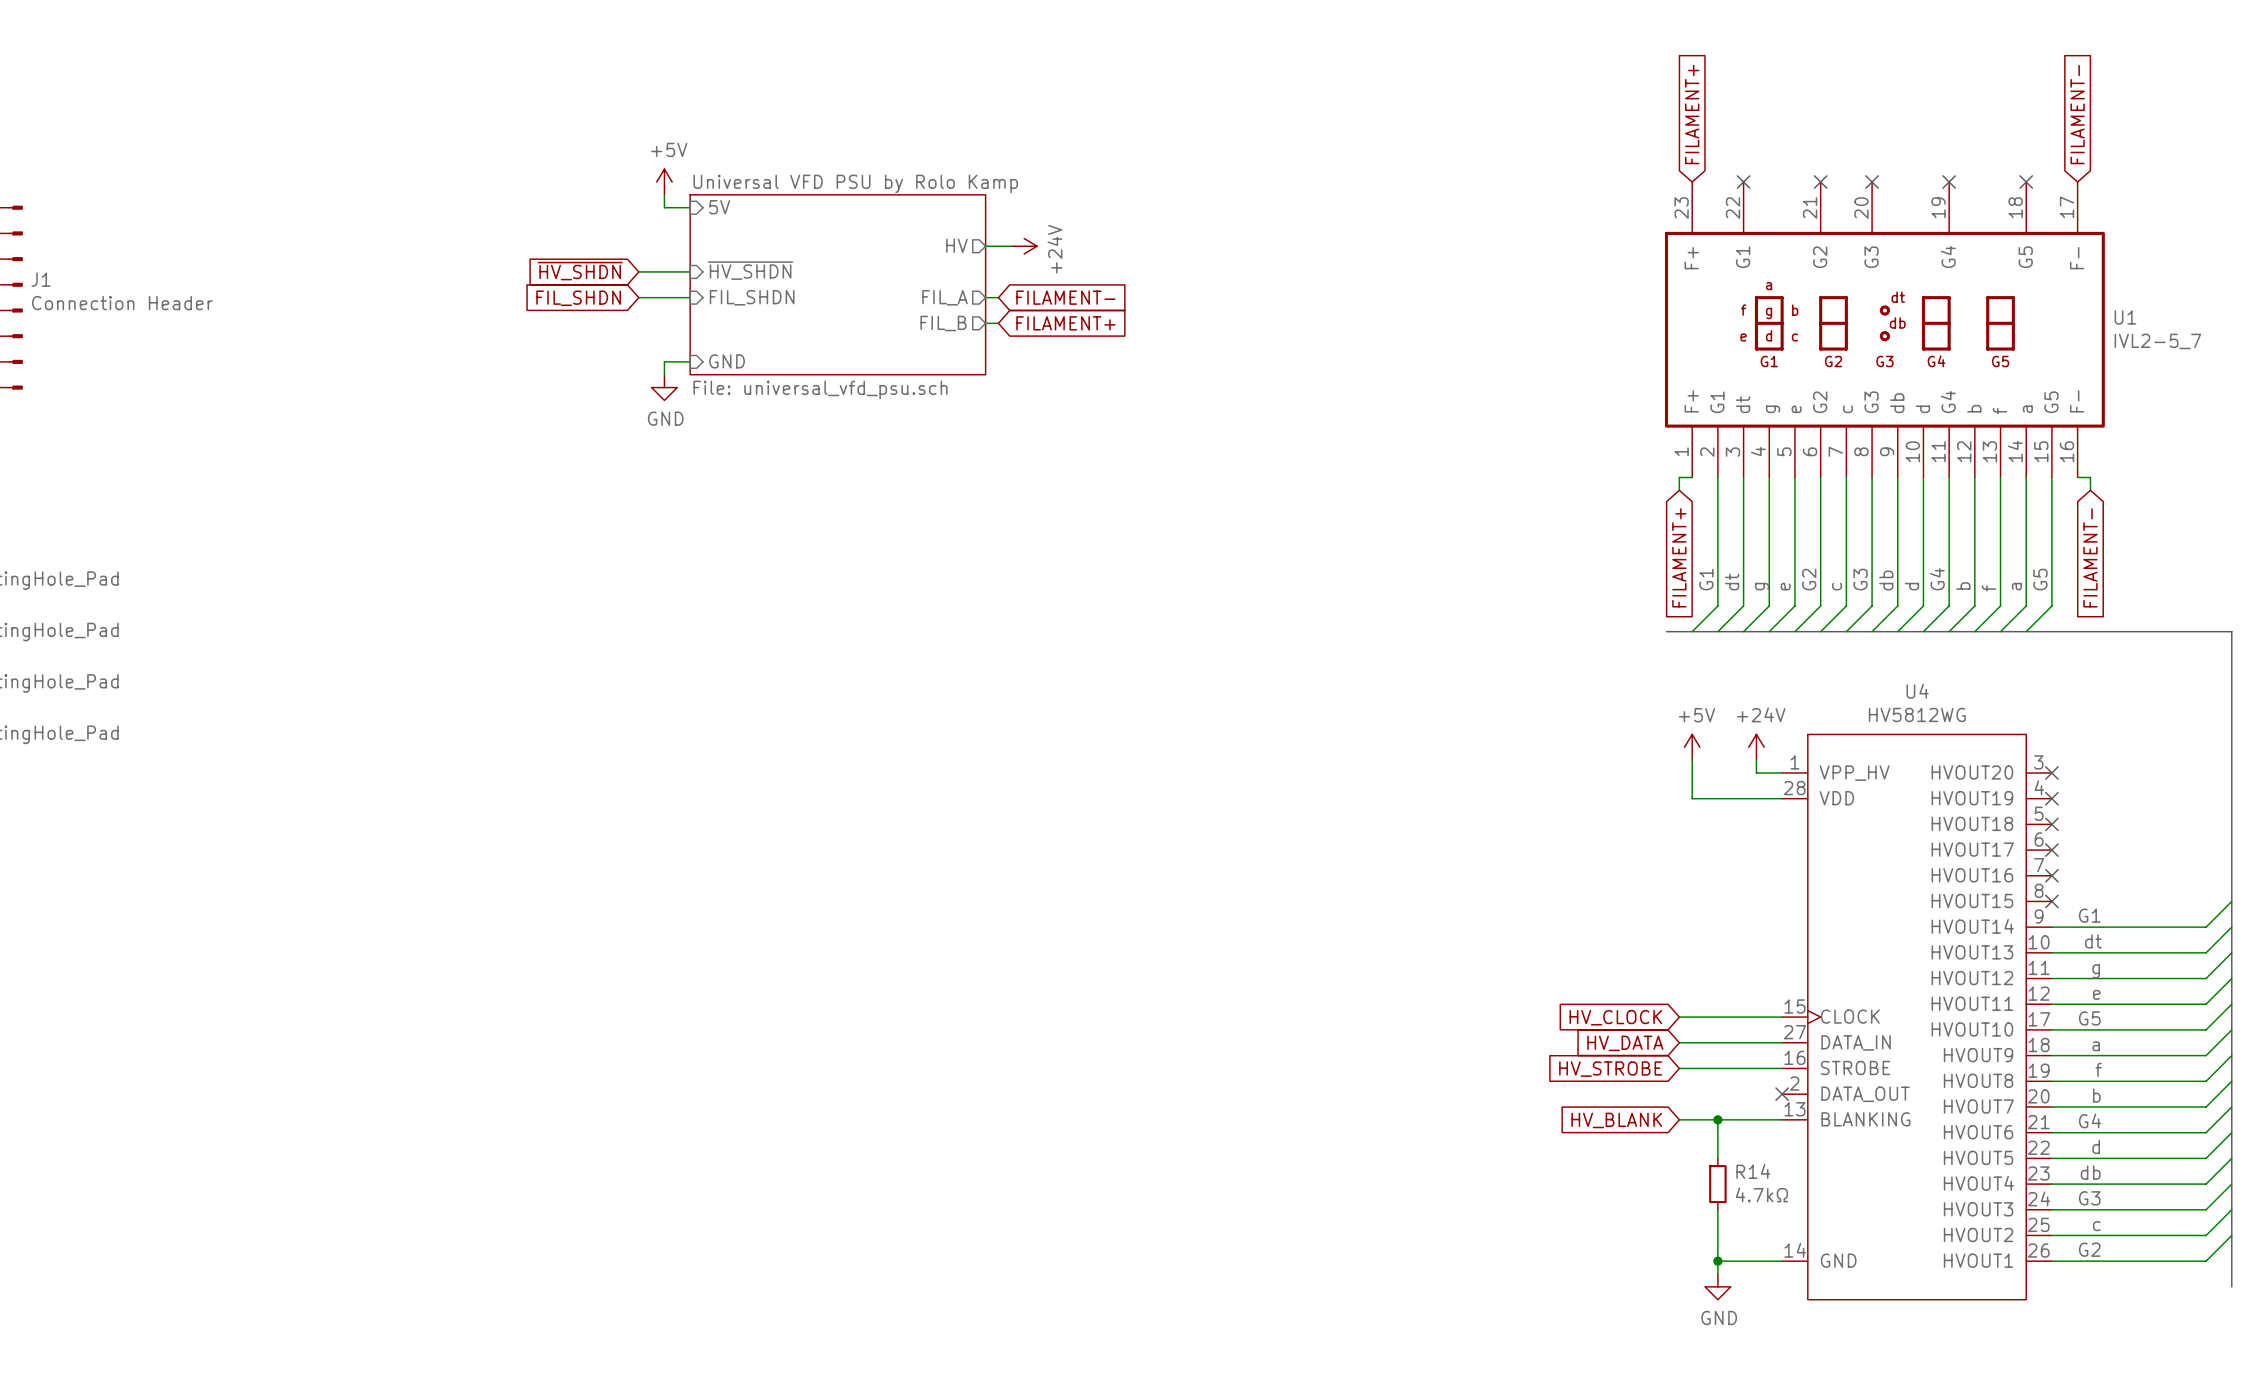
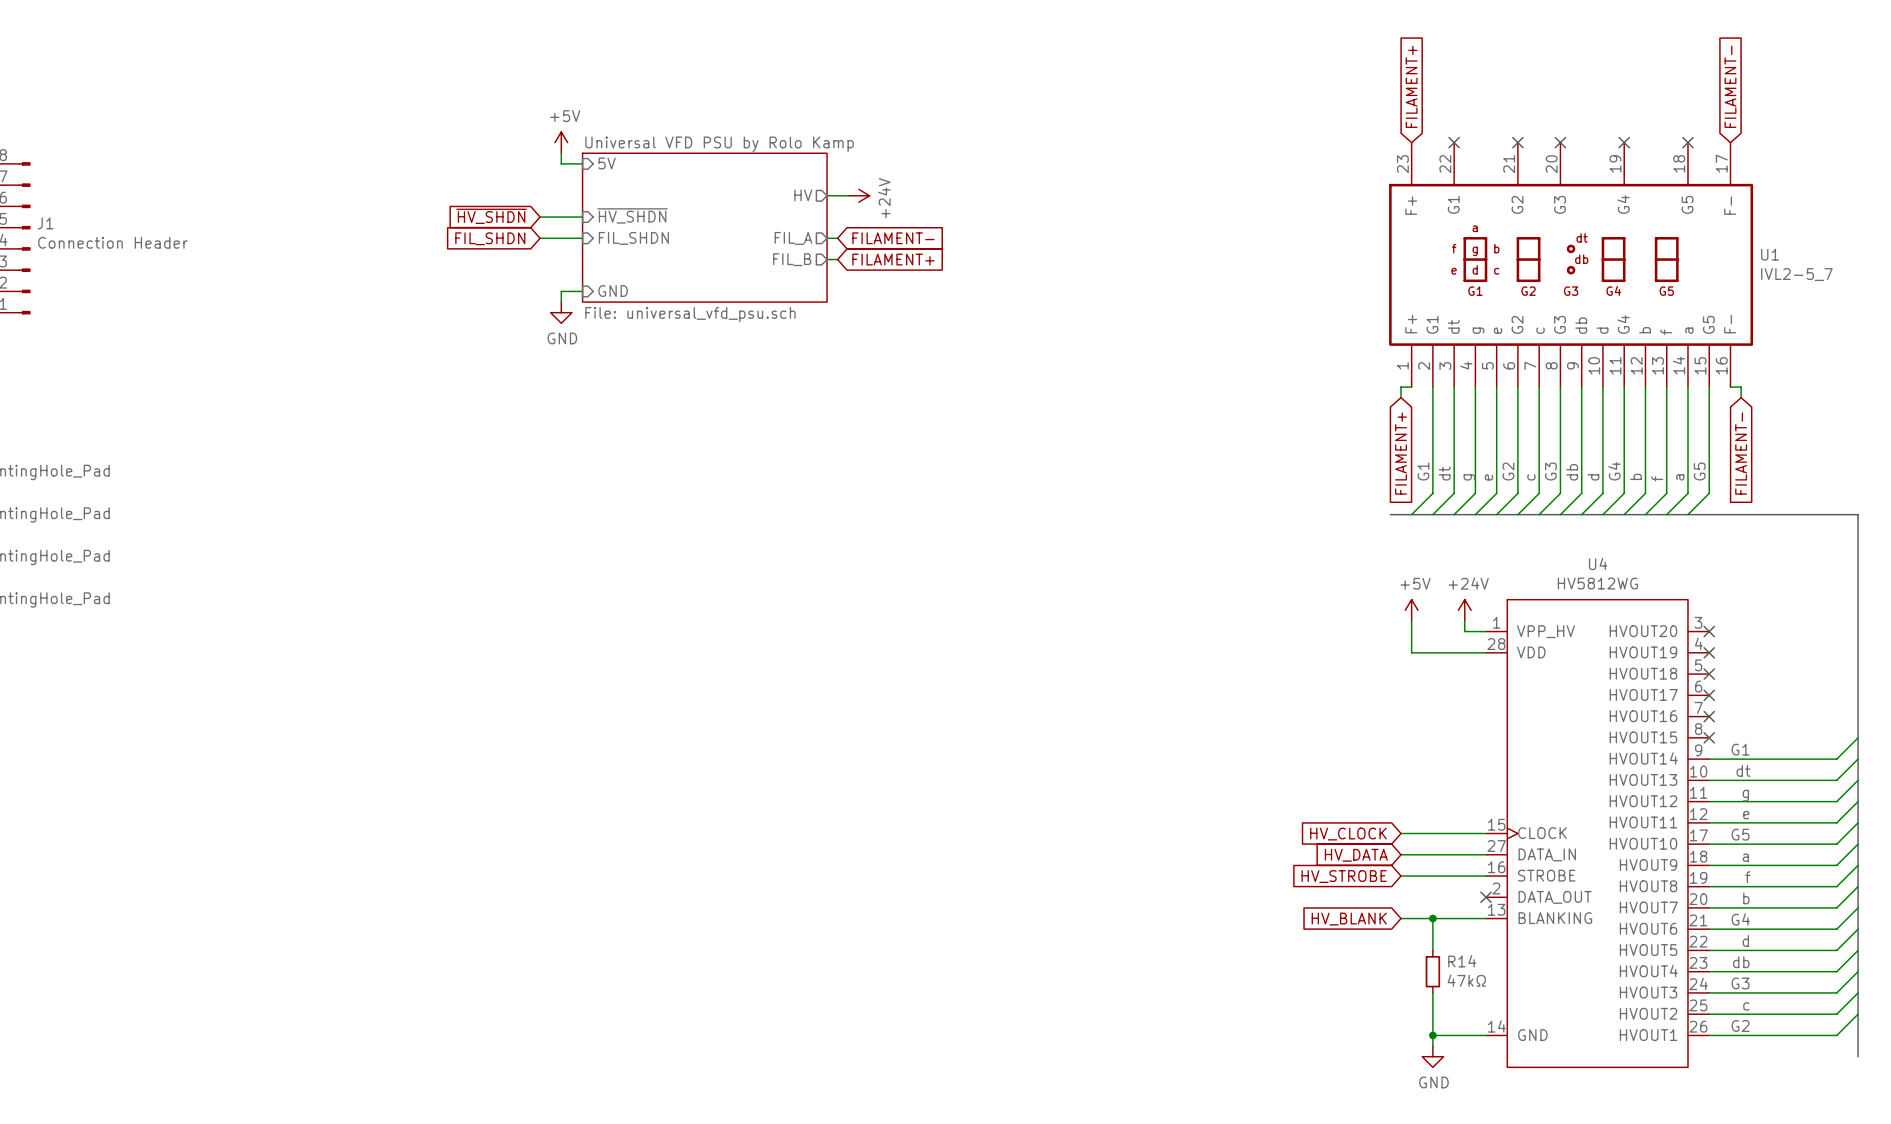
R14 value: 4.7kΩ (1761, 1194) -> 47kΩ (1466, 980)

